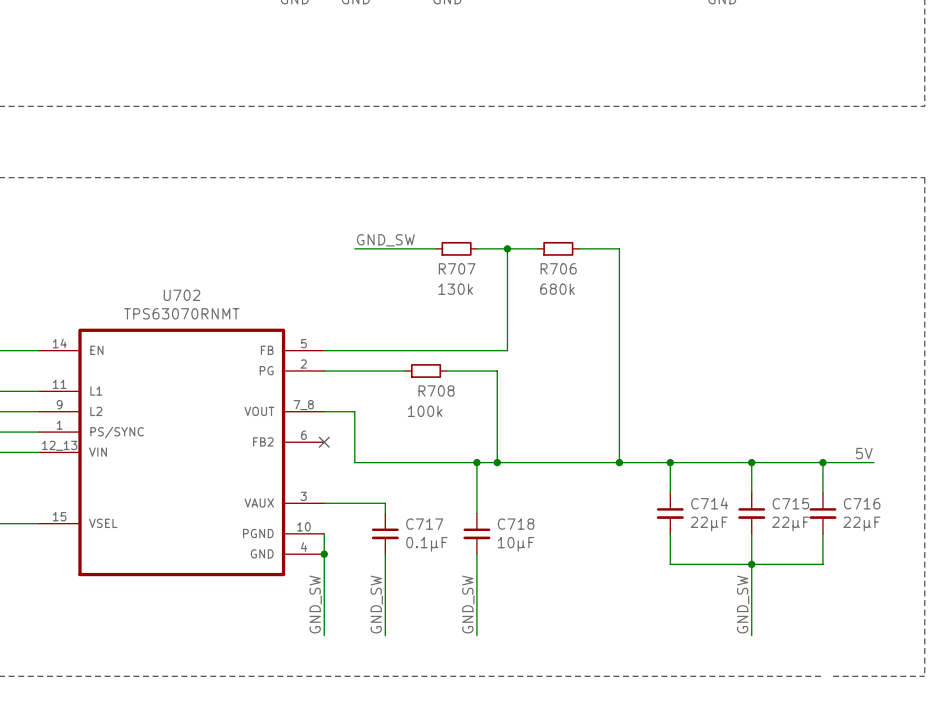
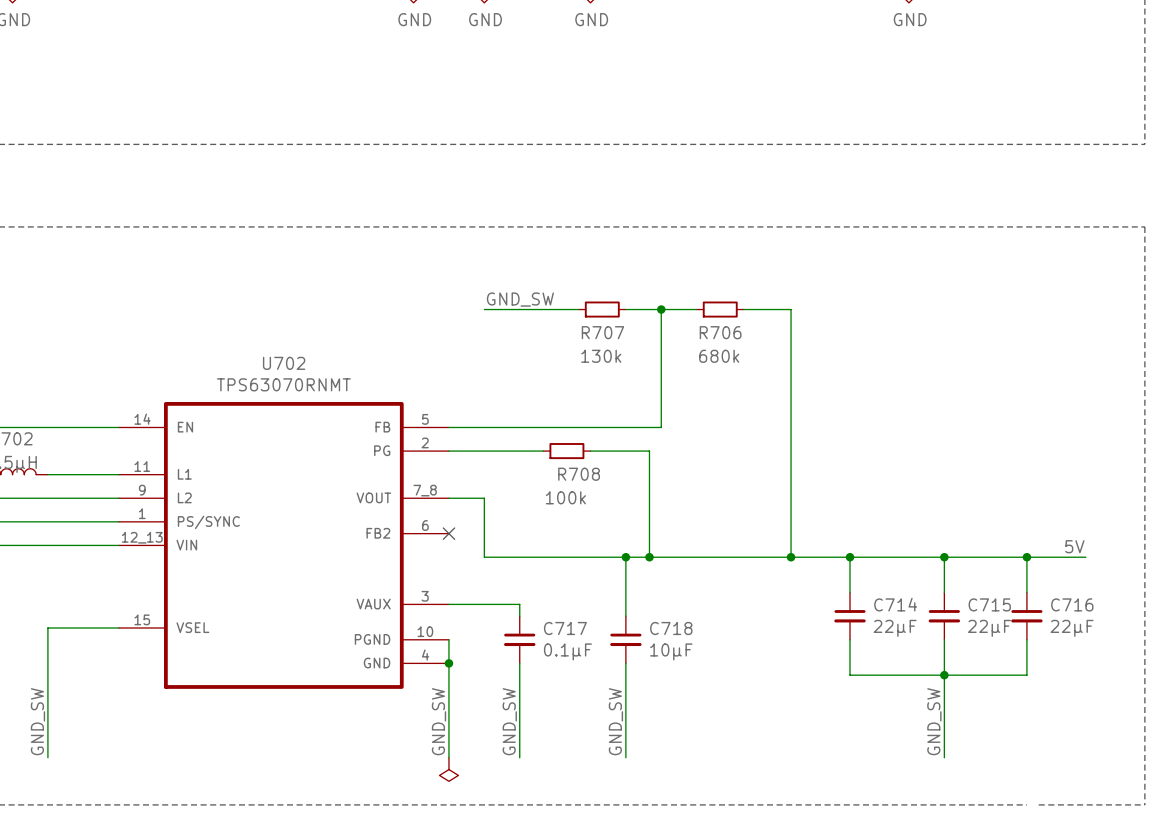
power symbol: none -> (448, 769)

